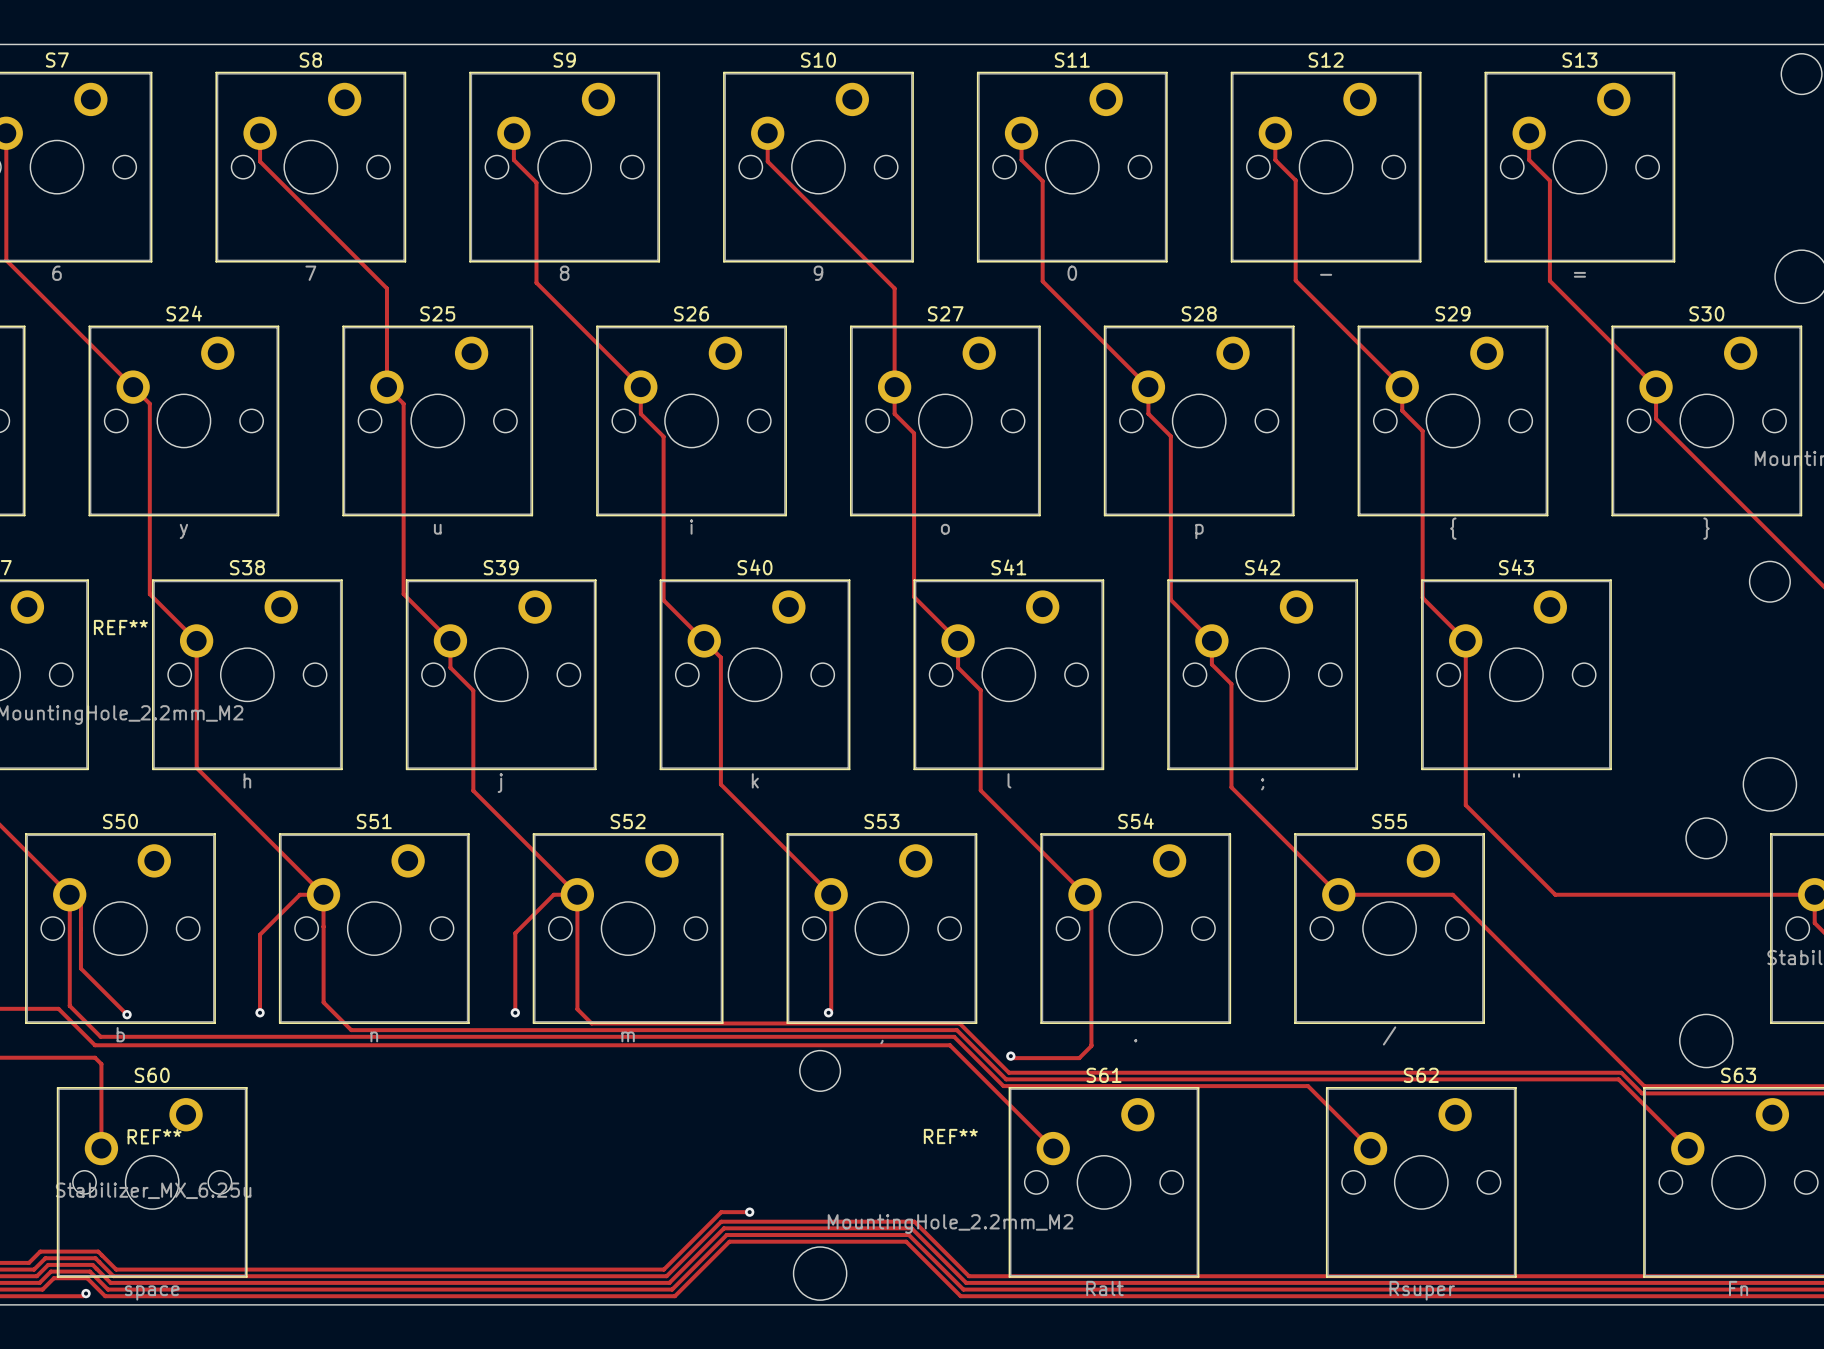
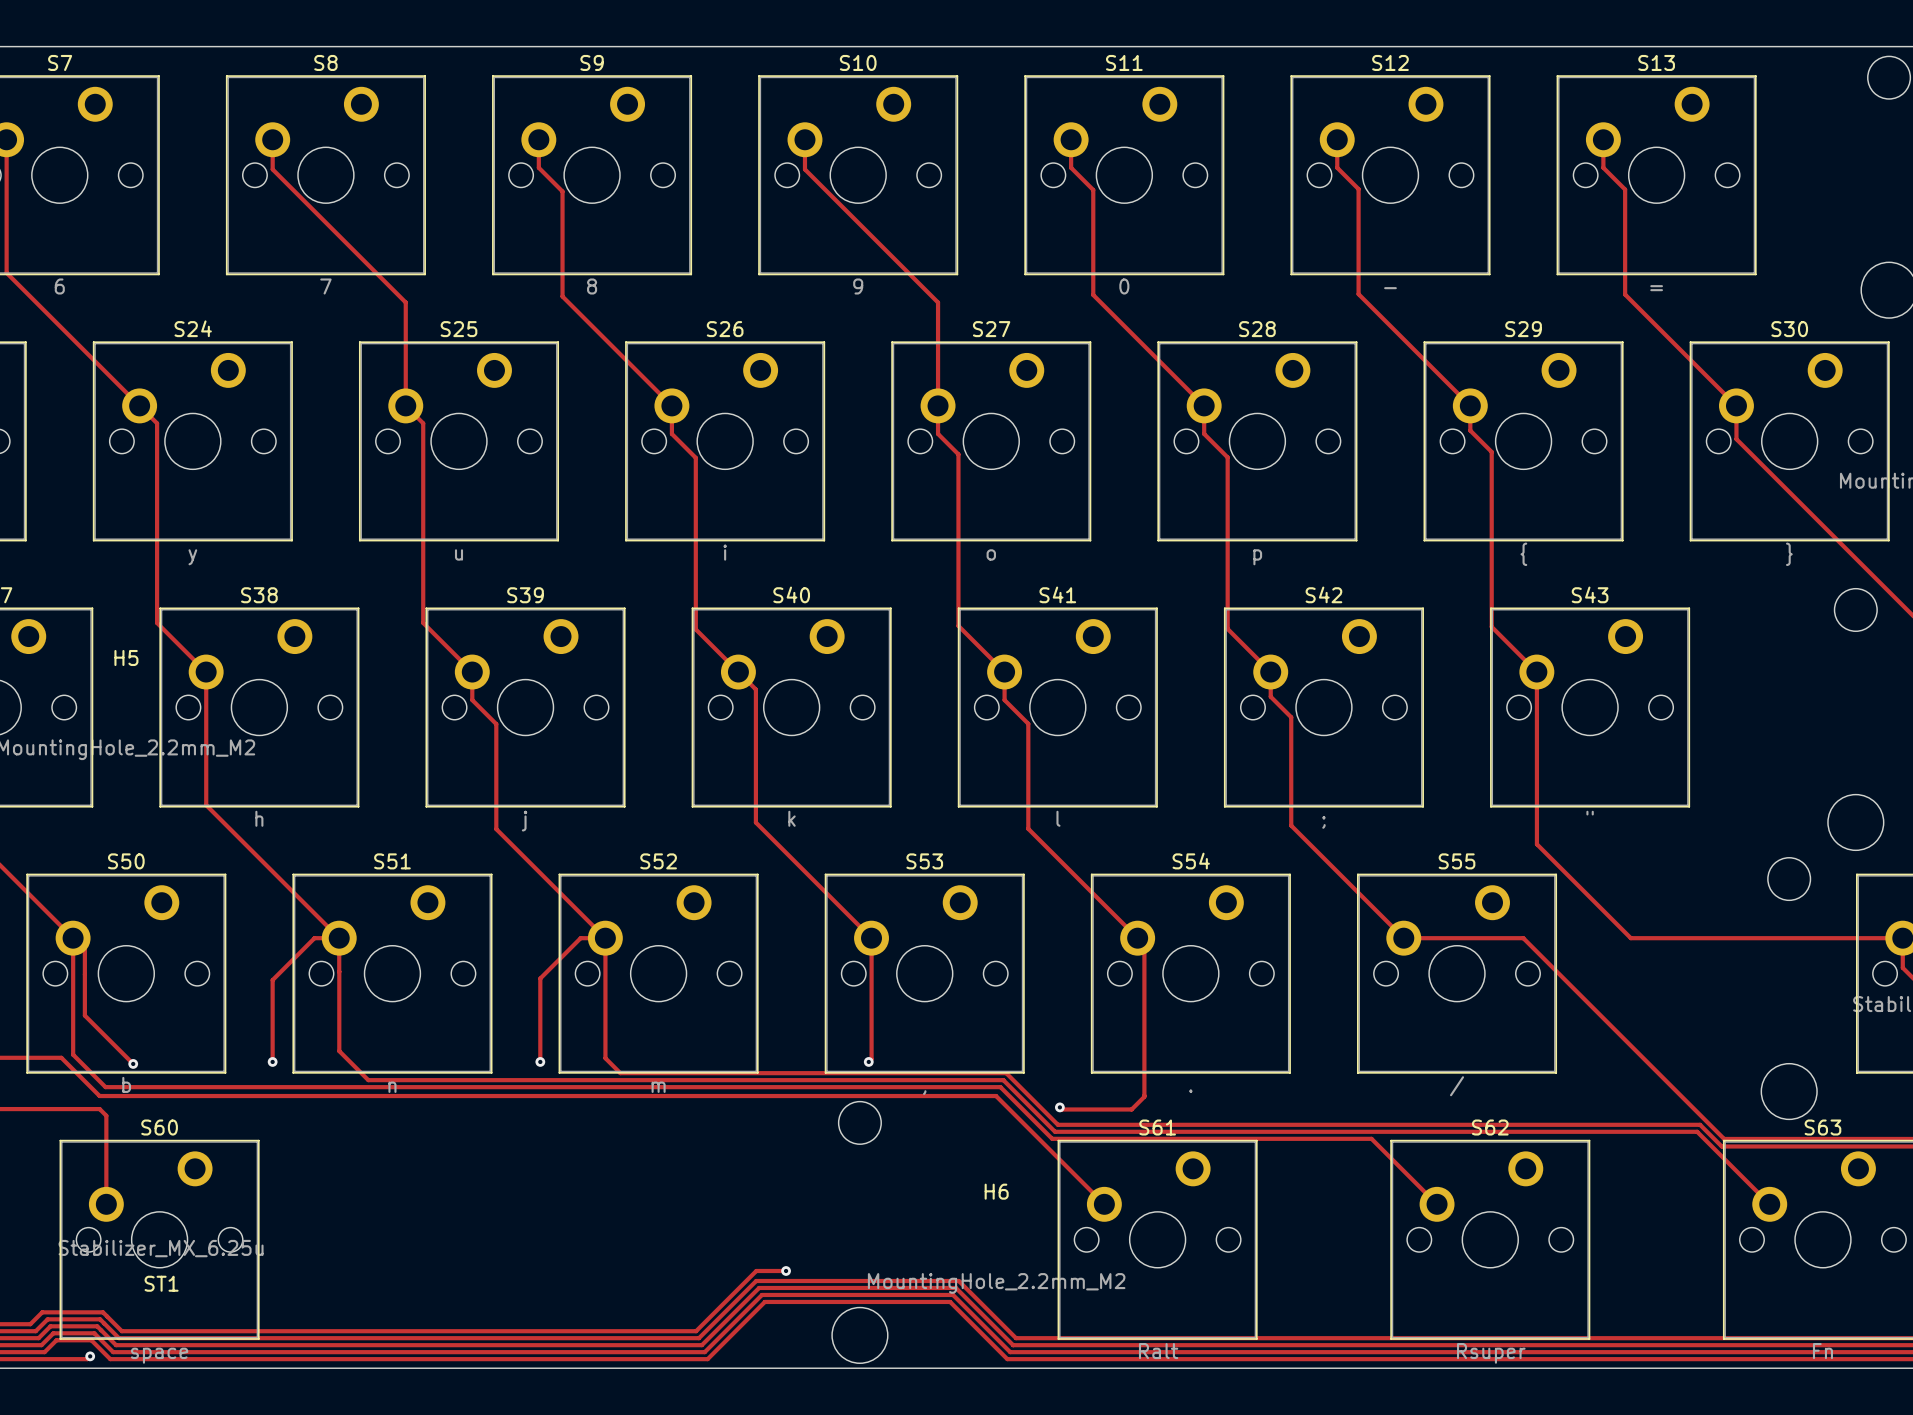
REF** name: REF** (120, 627) -> H5 (126, 658)
REF** name: REF** (154, 1136) -> ST1 (161, 1283)
REF** name: REF** (950, 1136) -> H6 (996, 1191)

